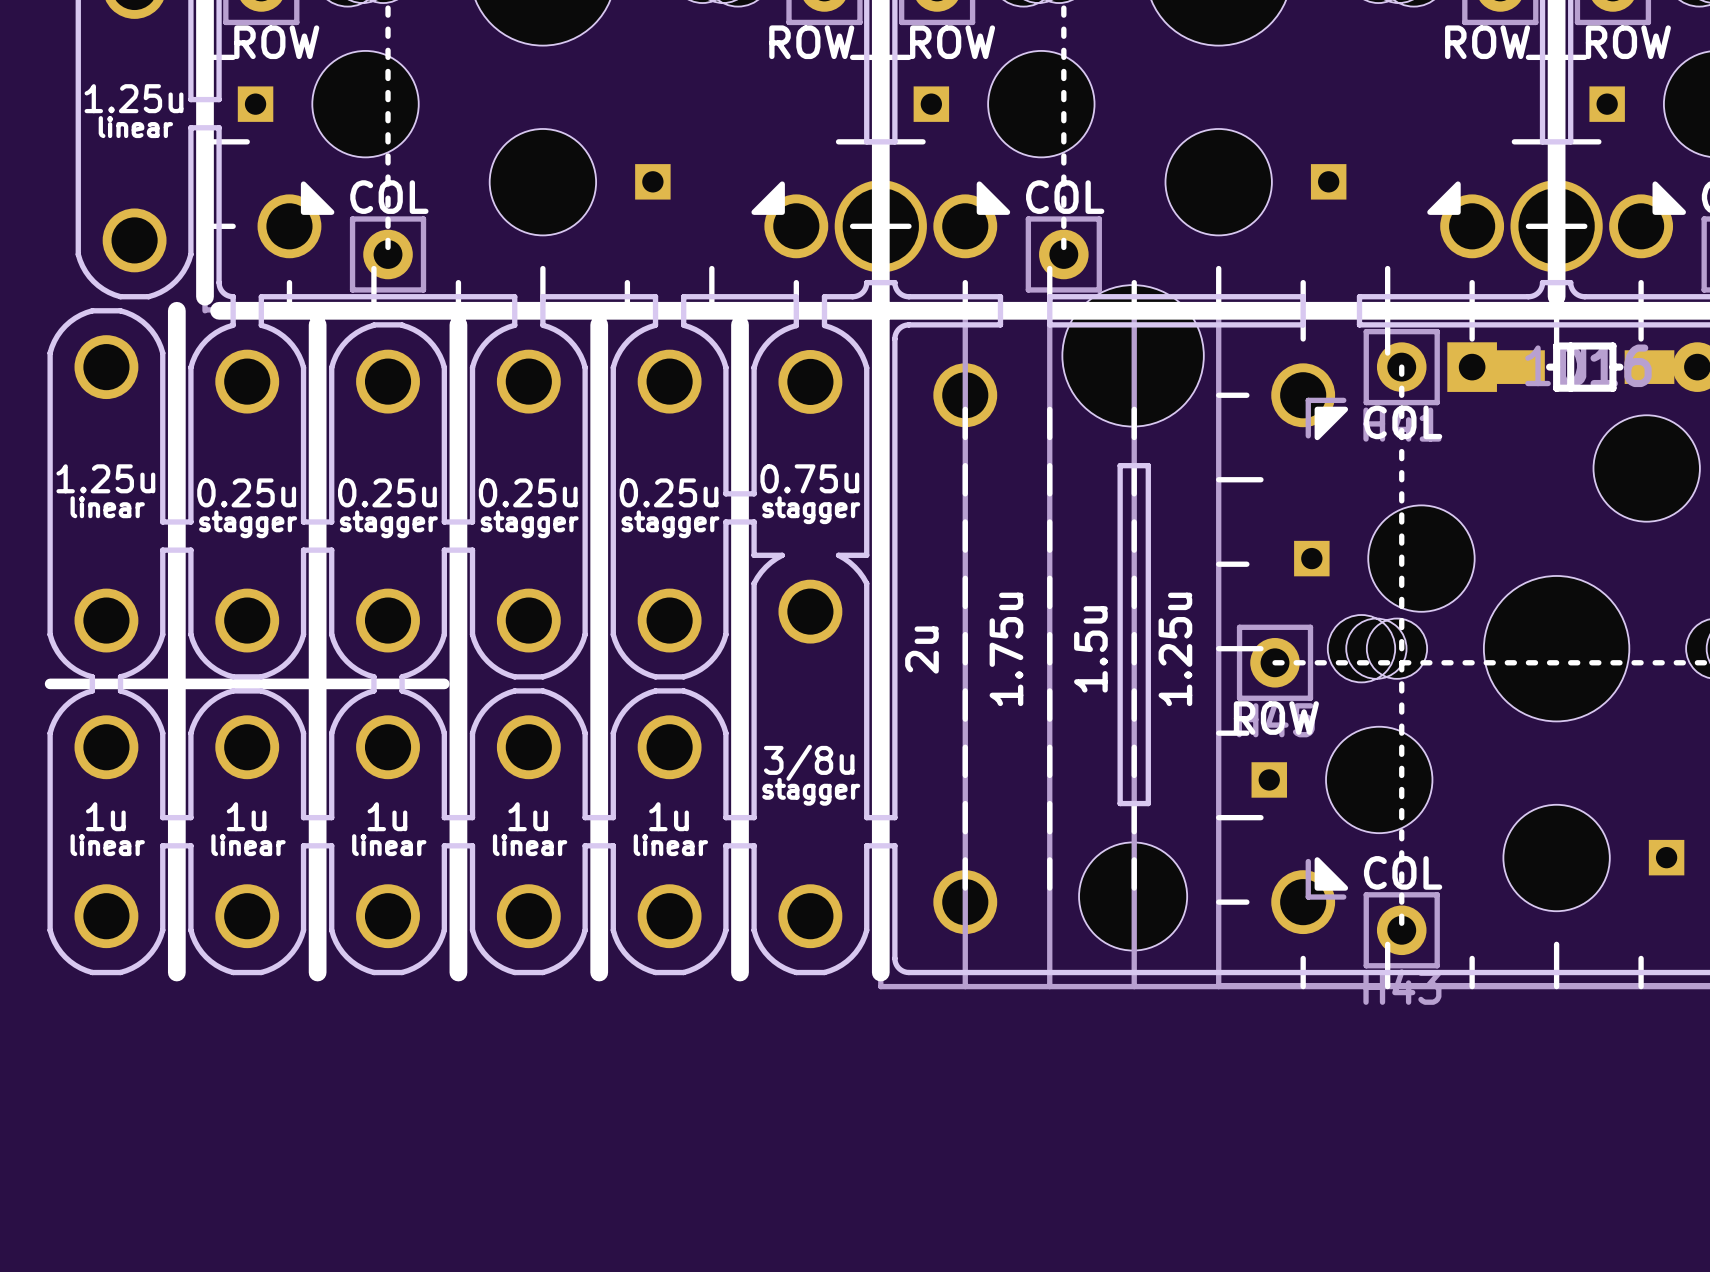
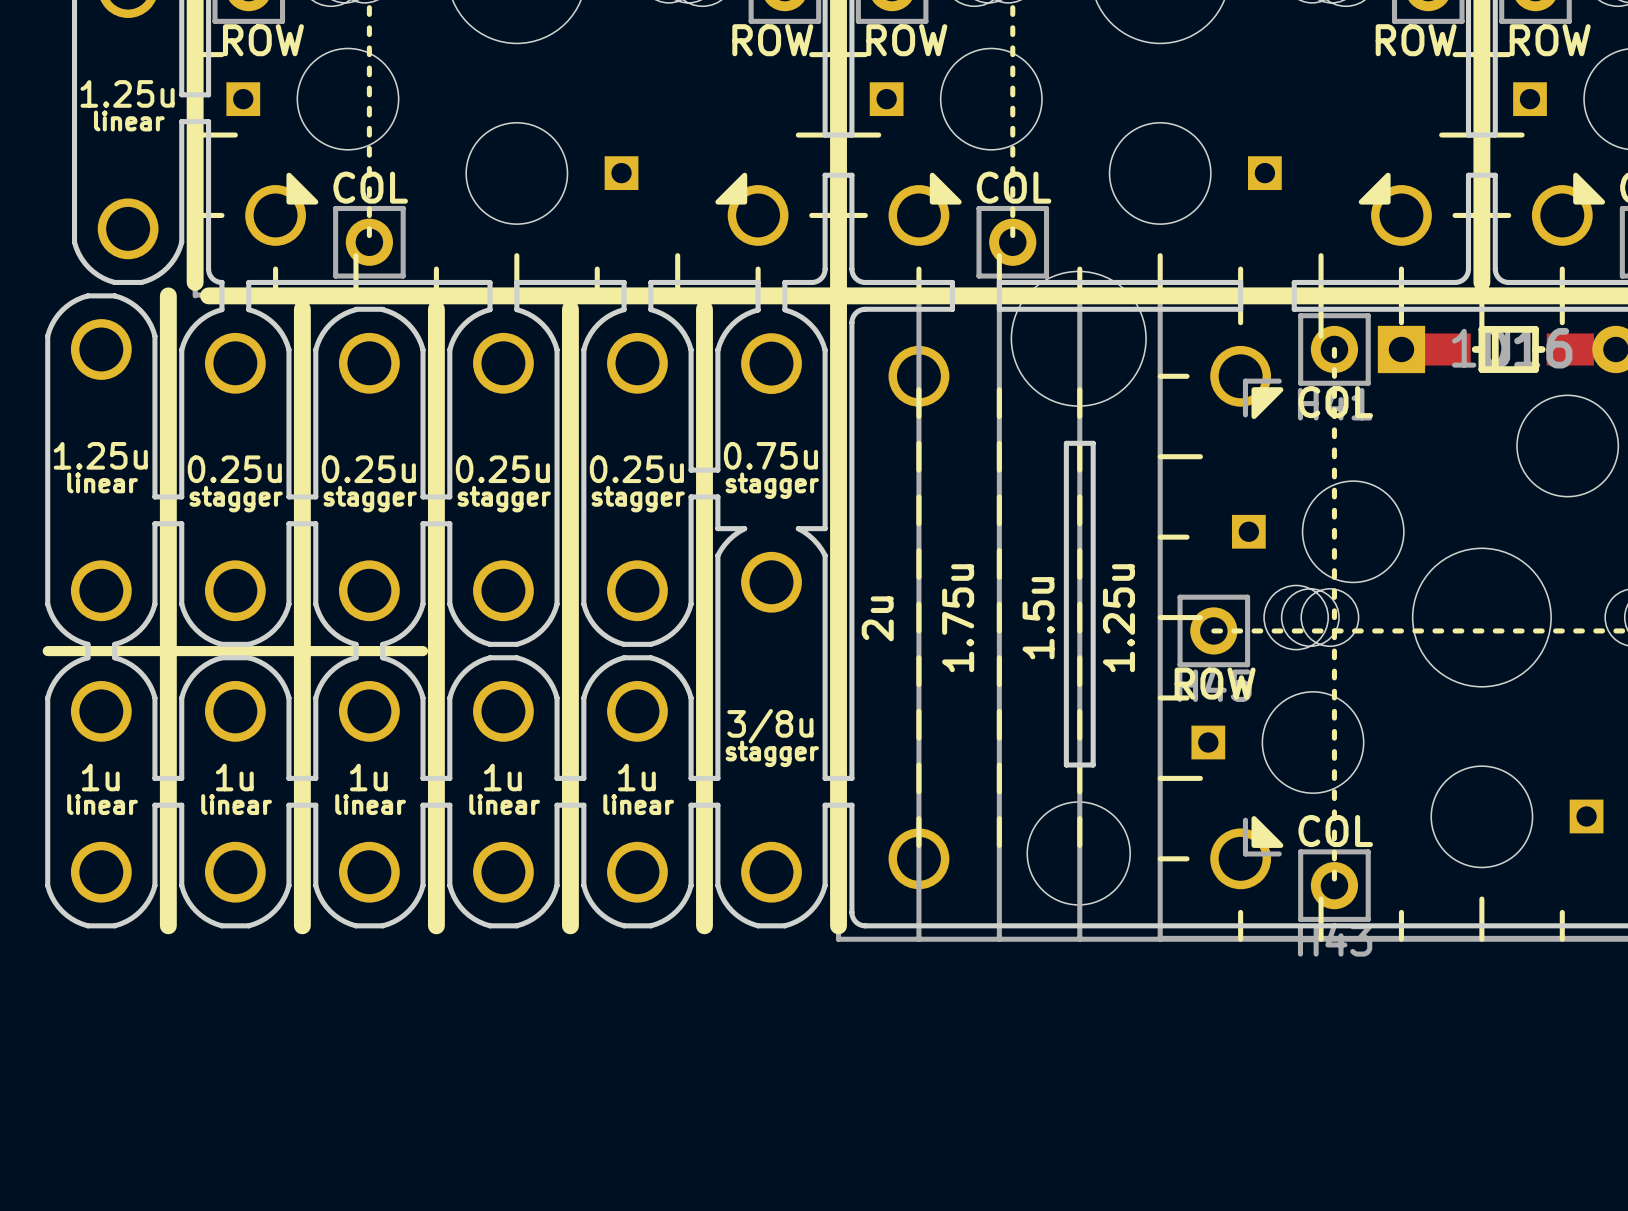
part: (880, 226) -> none
part: (1556, 226) -> none
board edge: (866, 282) (894, 282) -> (825, 269) (825, 175) (851, 175) (851, 269)
board edge: (1542, 282) (1570, 282) -> (1468, 269) (1468, 175) (1495, 175) (1495, 269)

